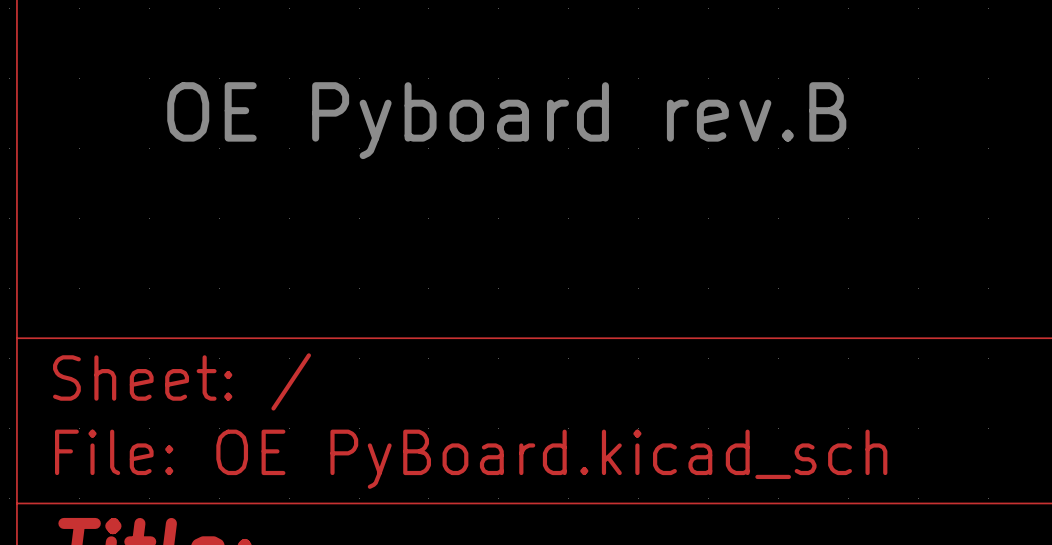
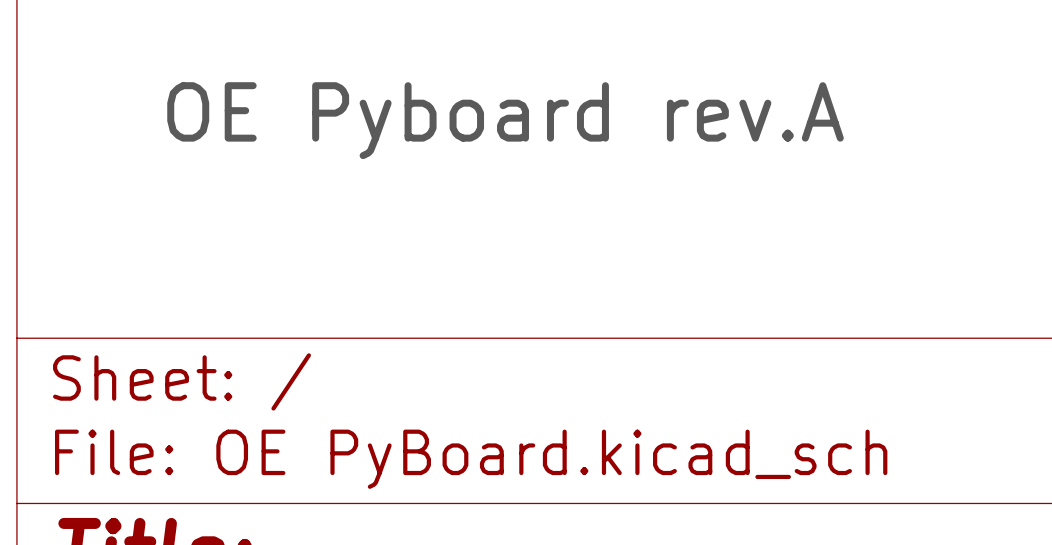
text: OE Pyboard rev.B (506, 120) -> OE Pyboard rev.A (505, 120)

